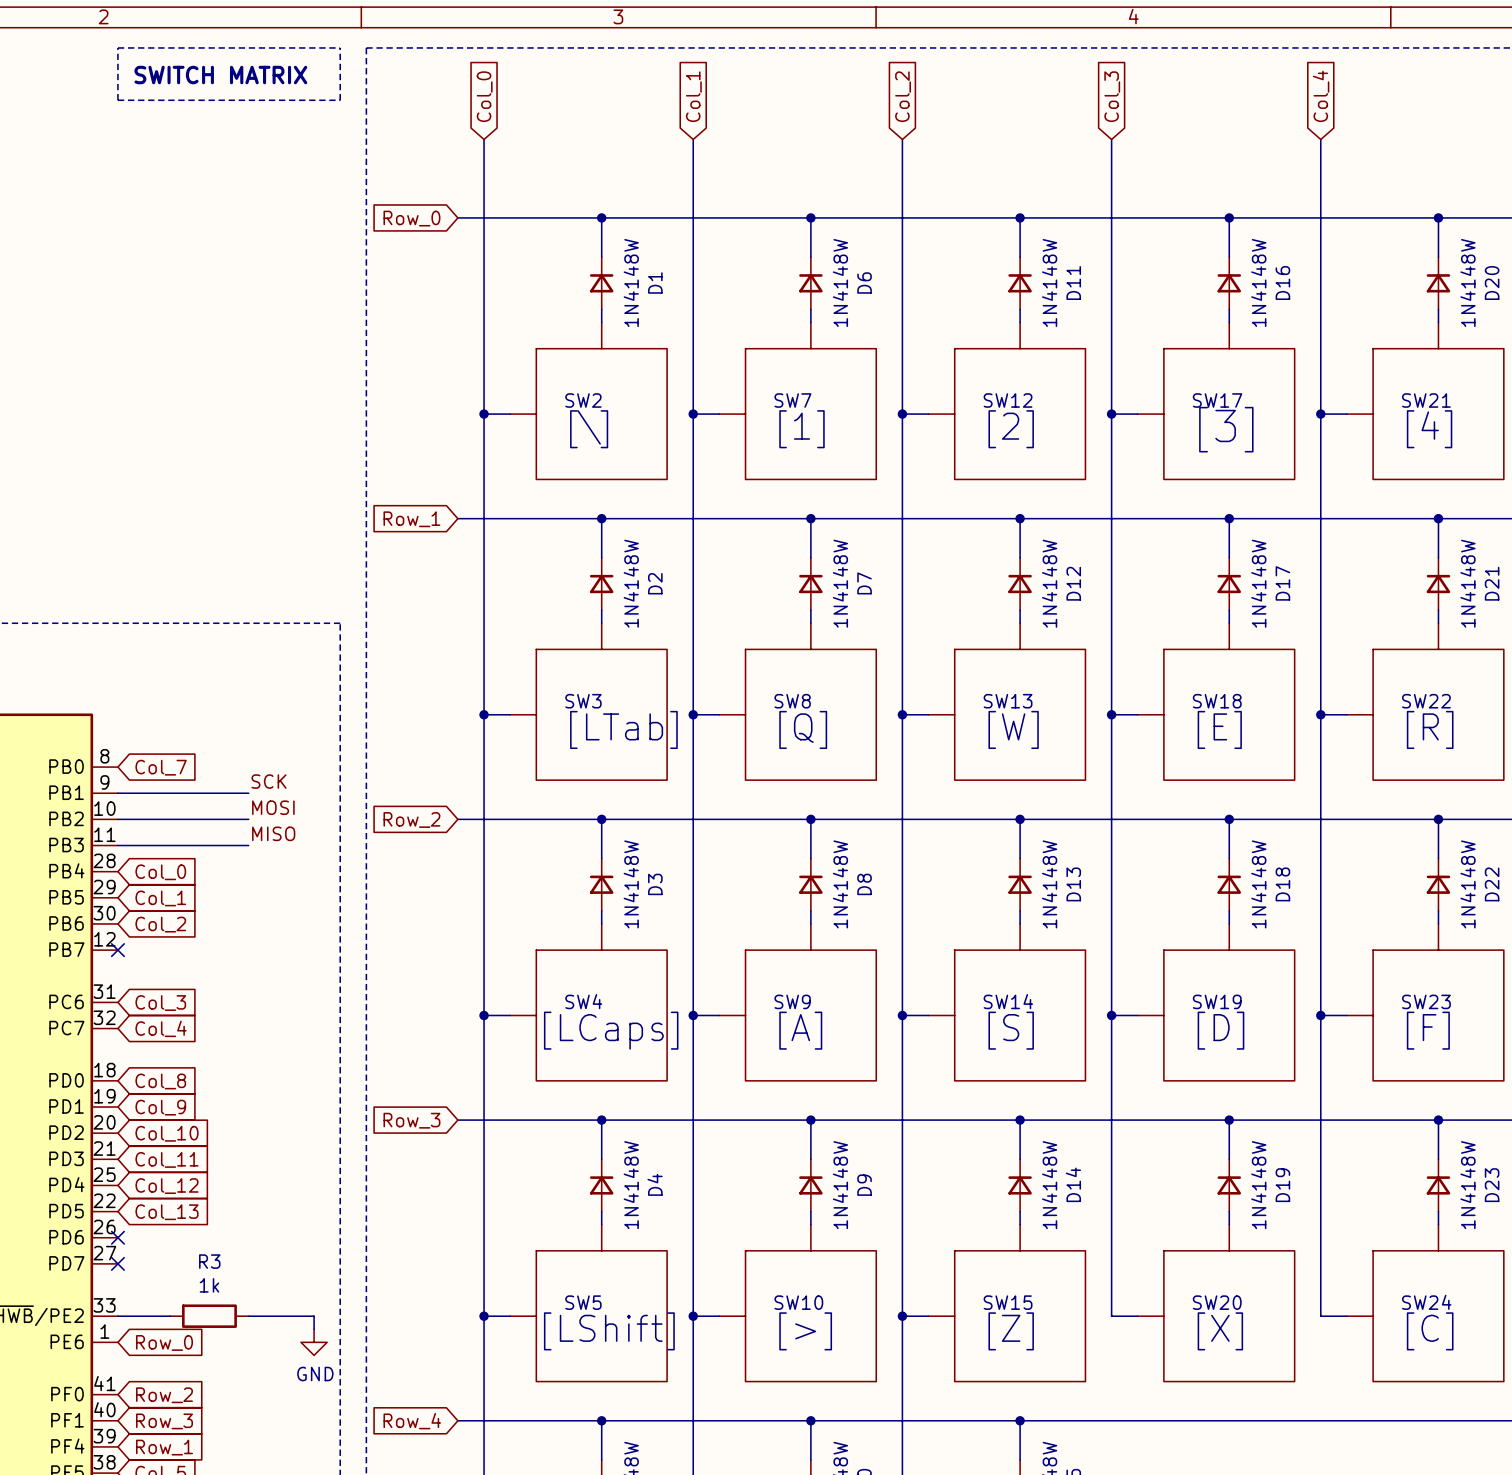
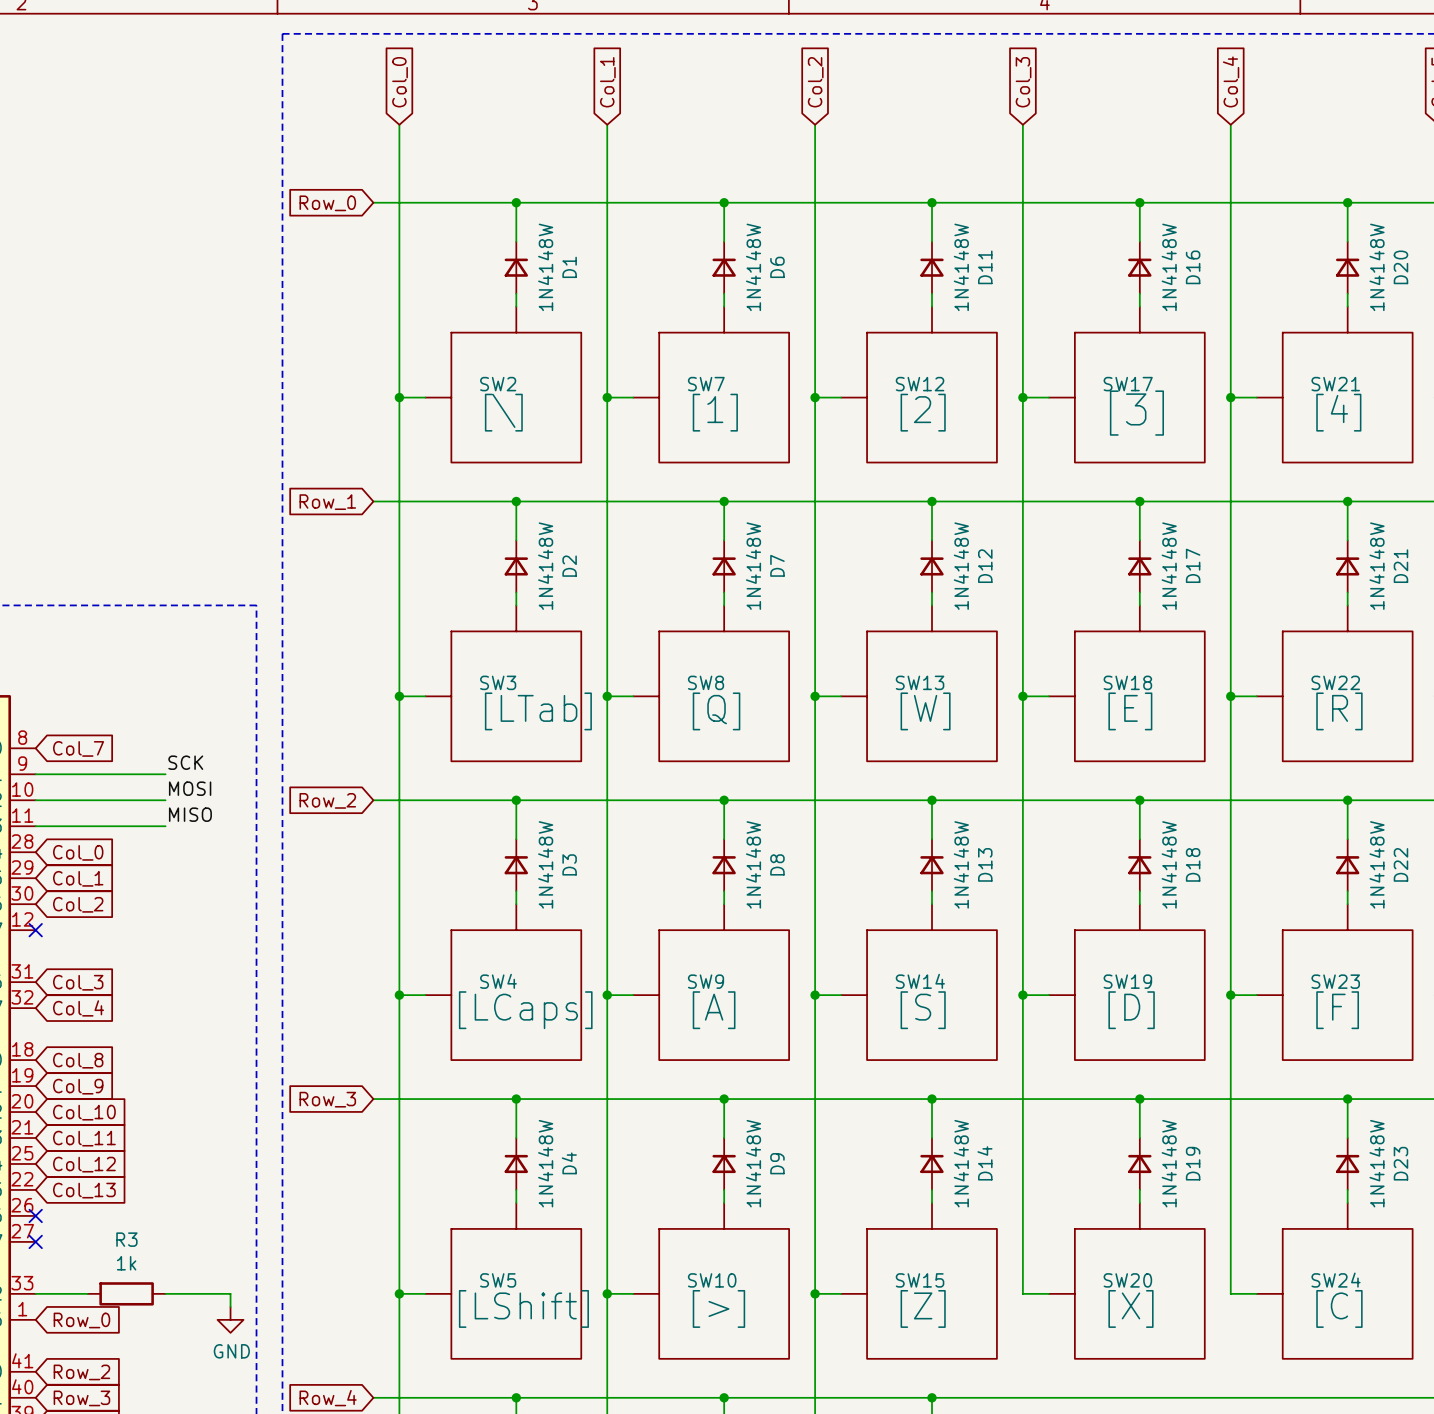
line: (117, 47) (117, 100) (340, 100) (340, 47) (117, 47) -> none
text: SWITCH MATRIX (220, 75) -> none

